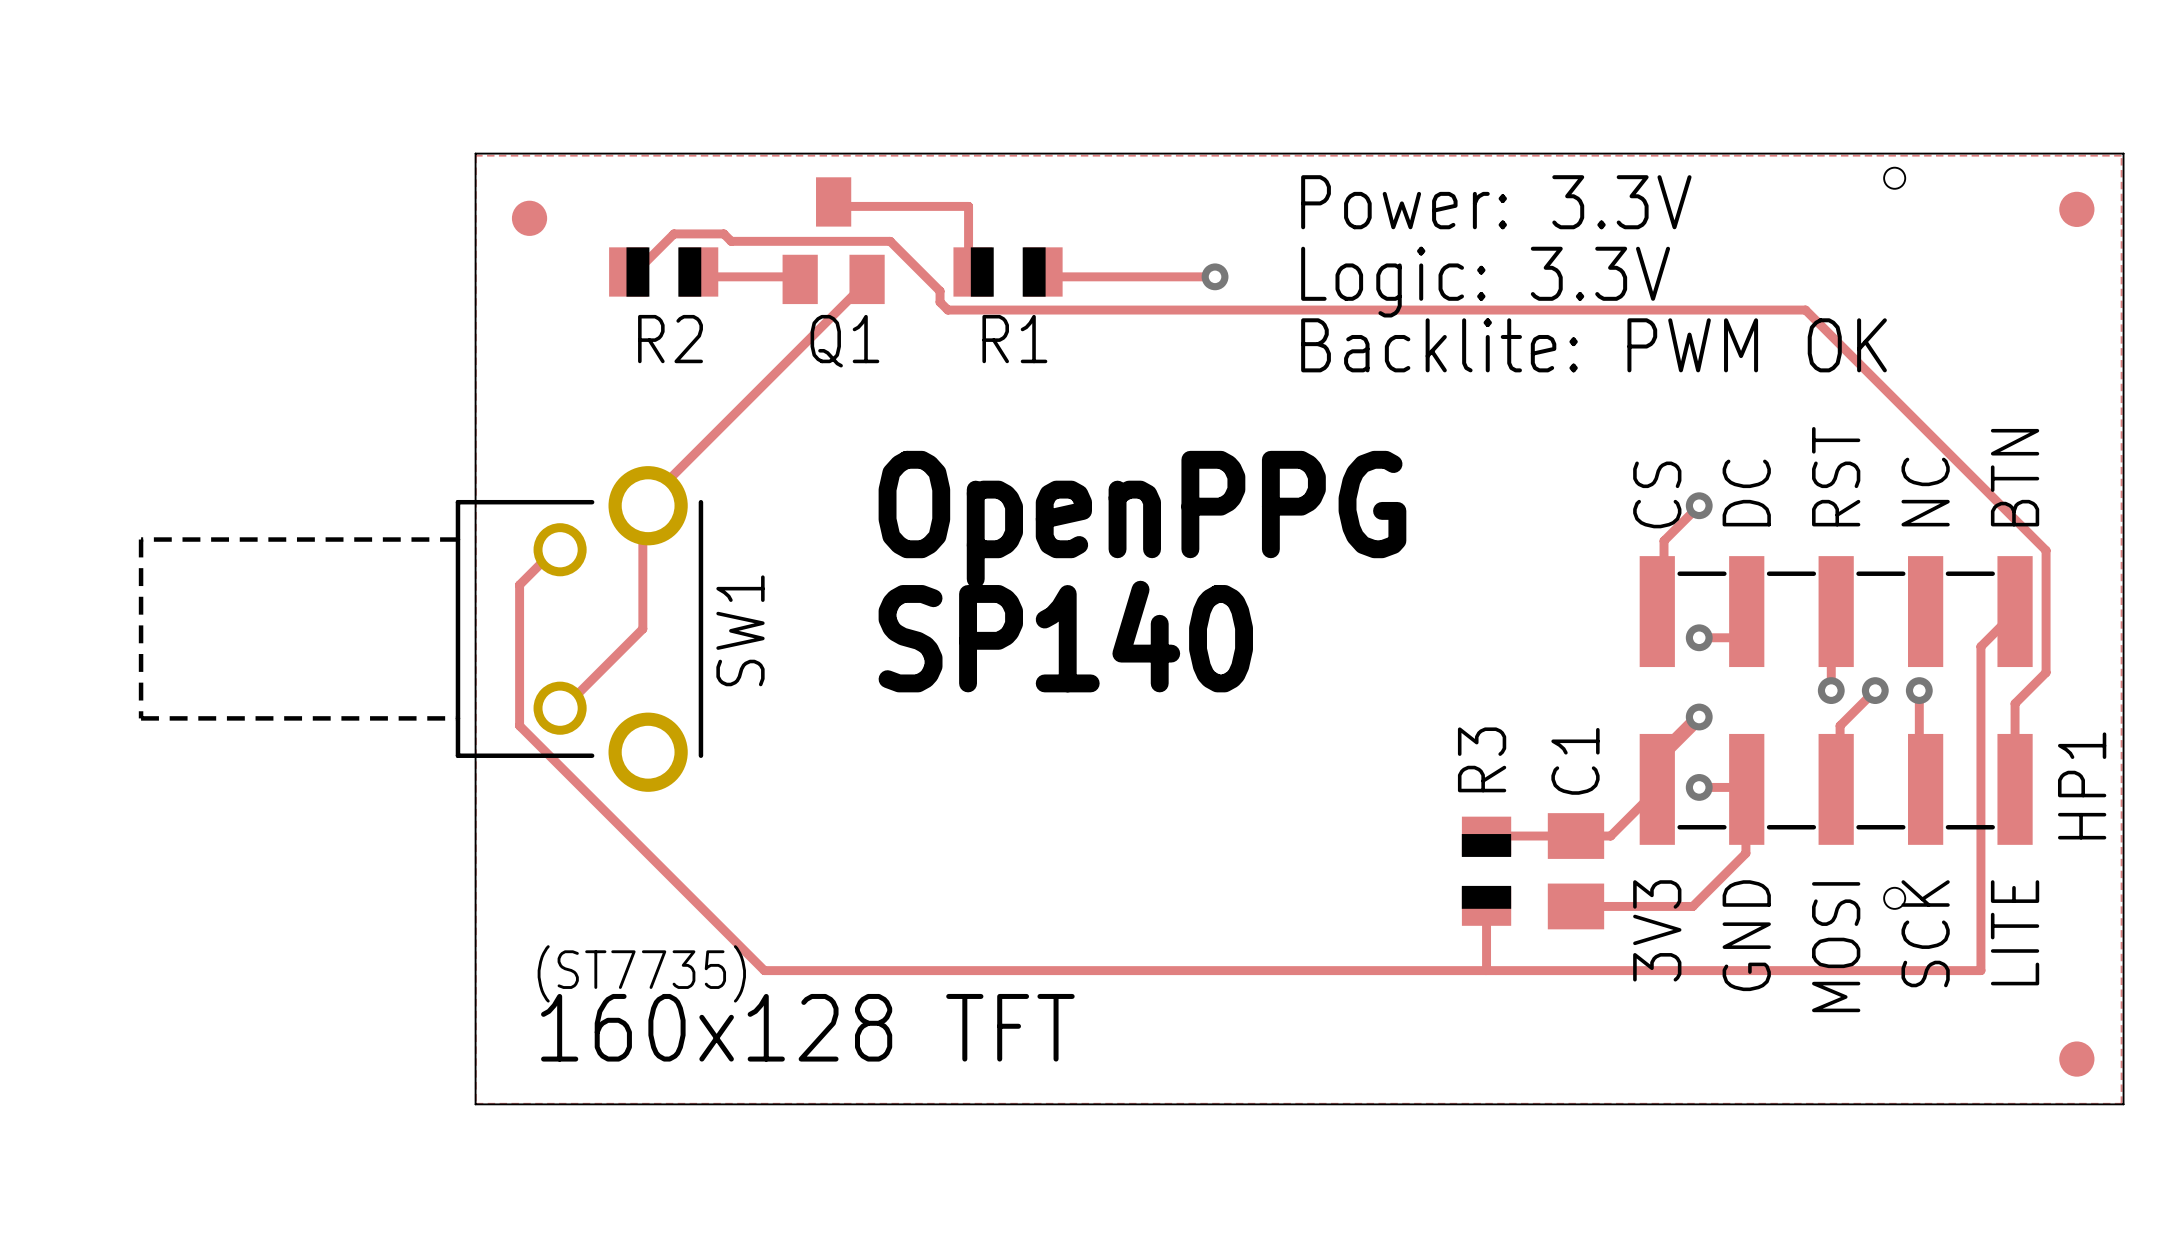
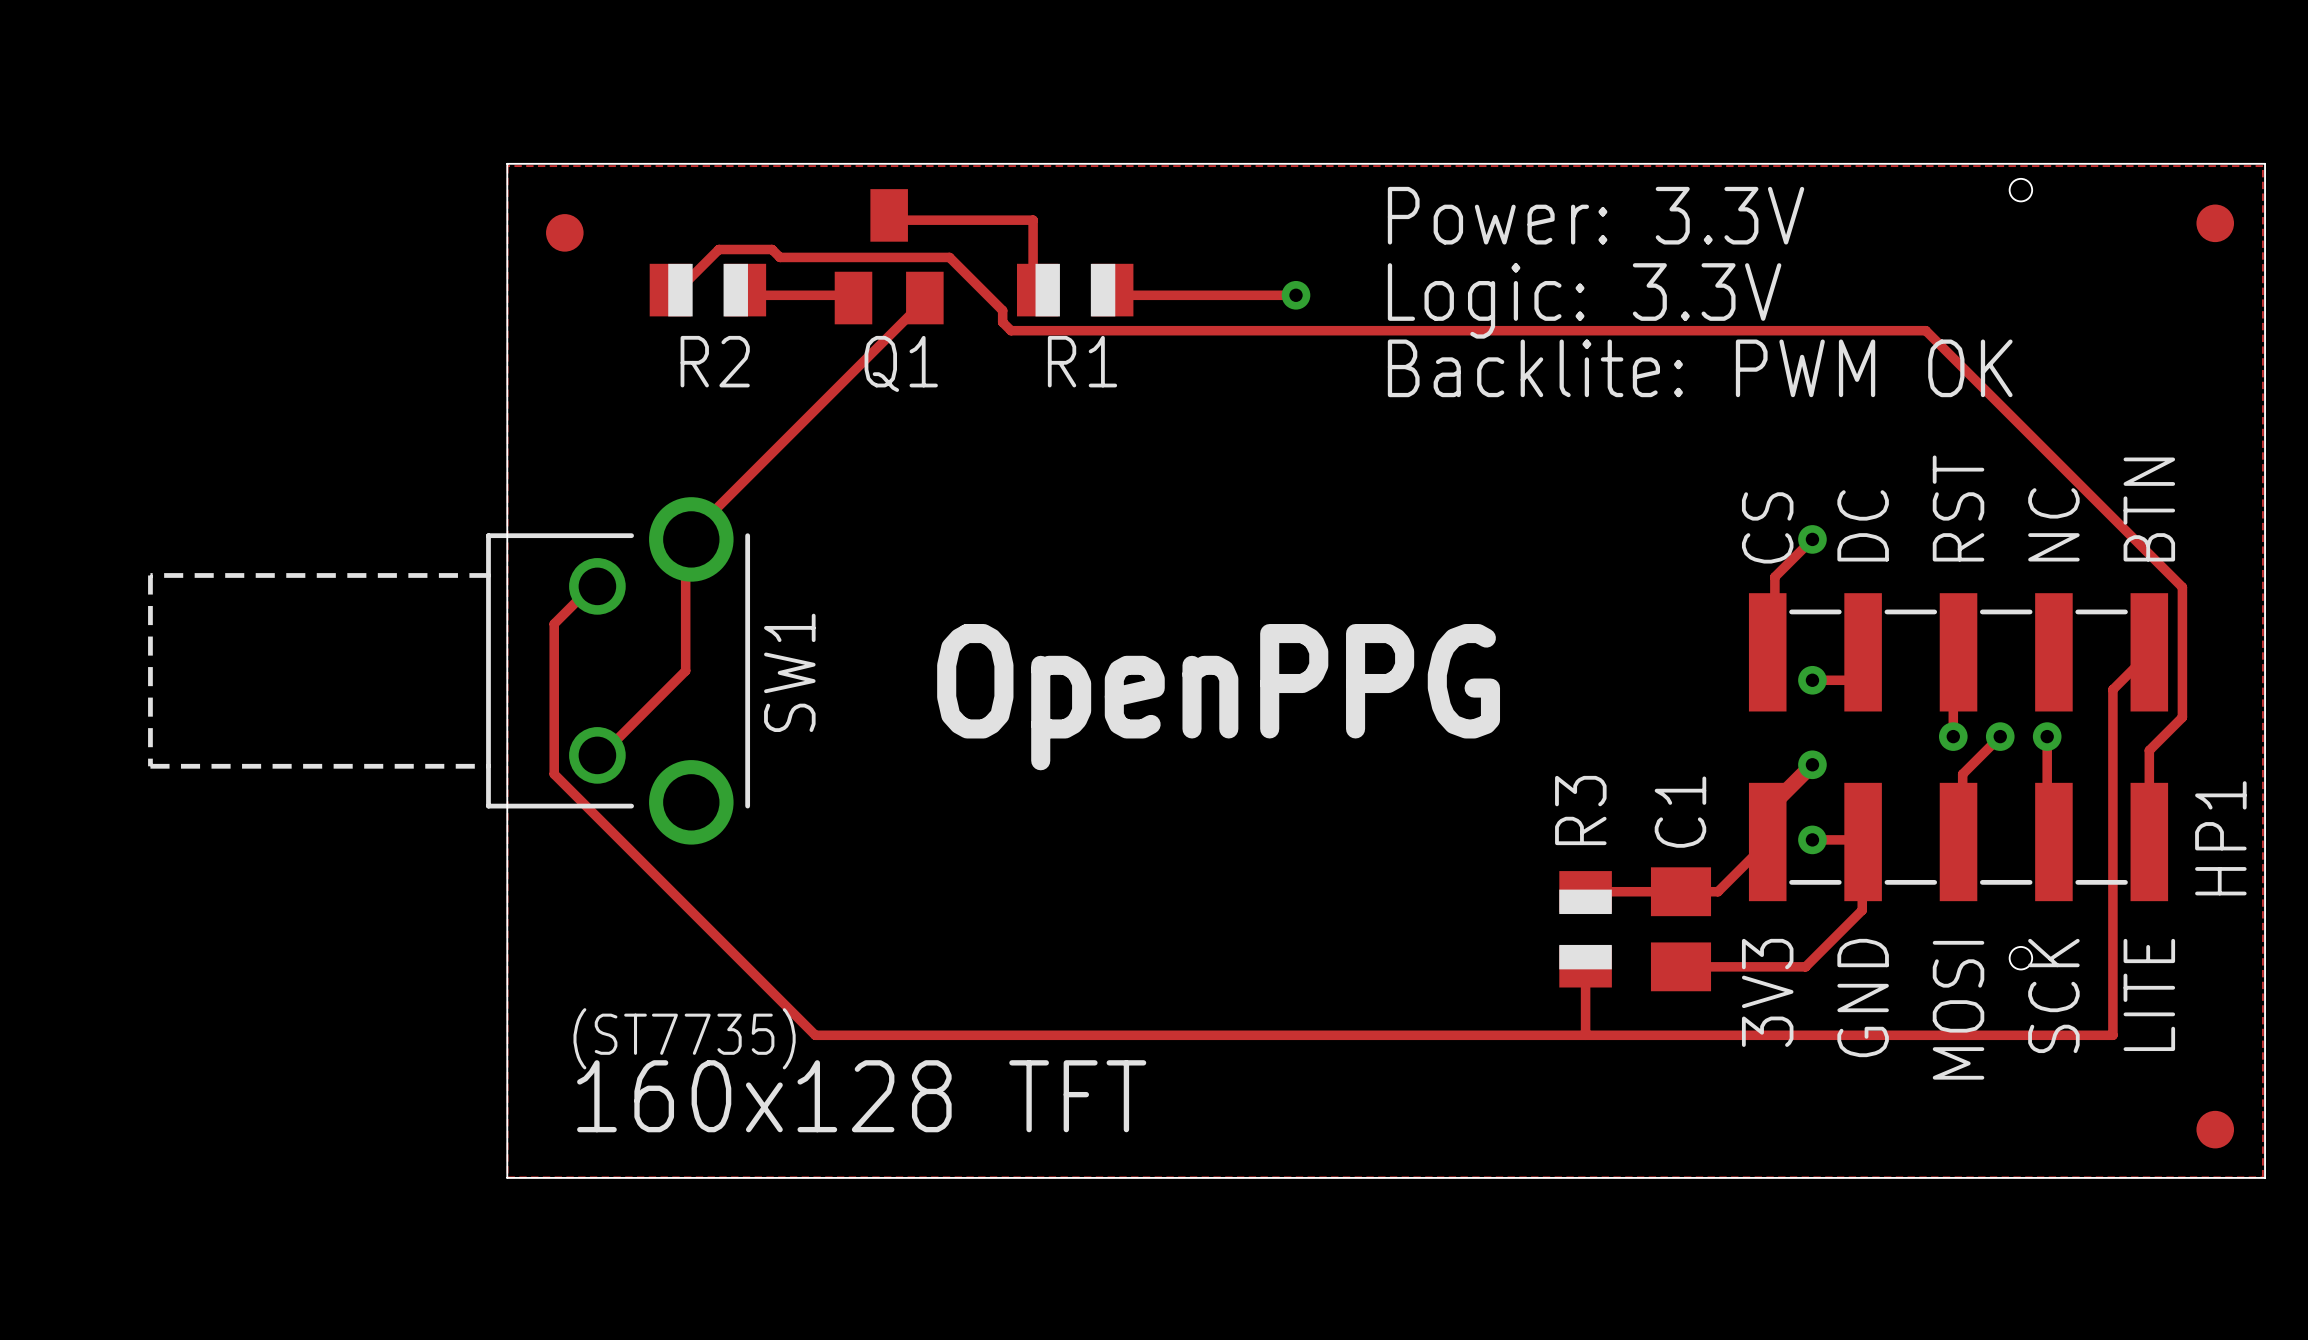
text: OpenPPG (1142, 519) -> none
text: SP140 (1065, 636) -> OpenPPG (1218, 697)

